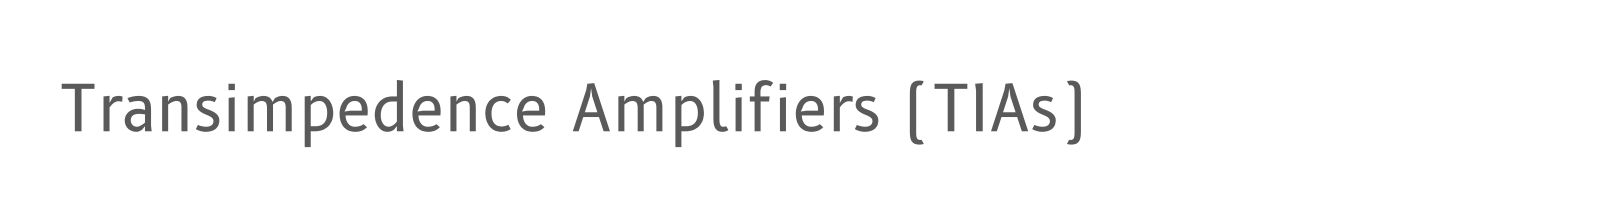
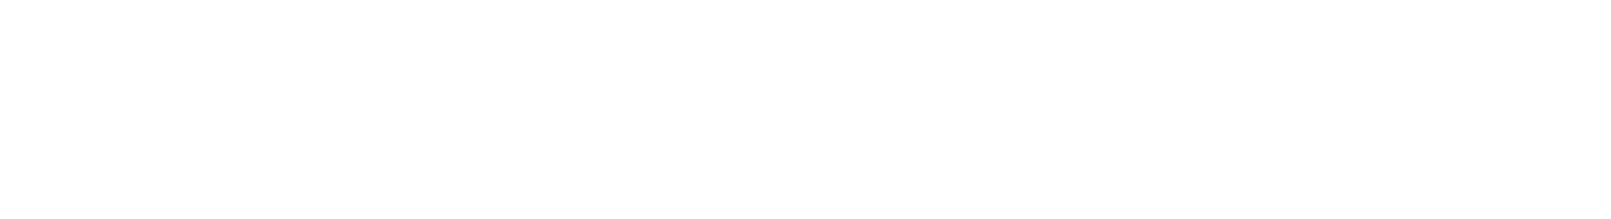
text: Transimpedence Amplifiers (TIAs) (571, 113) -> none

